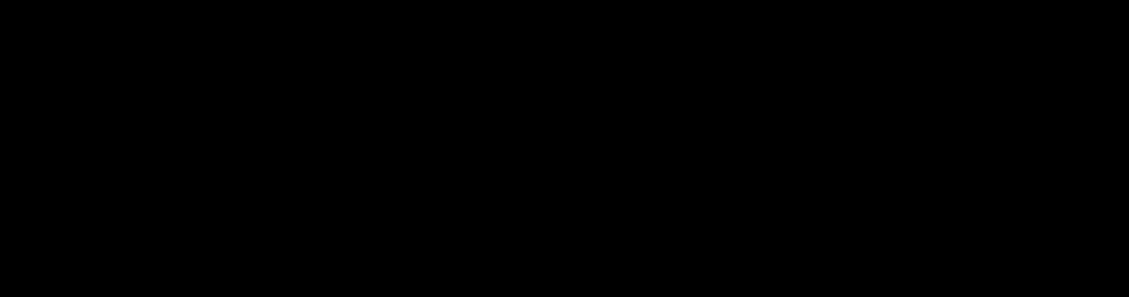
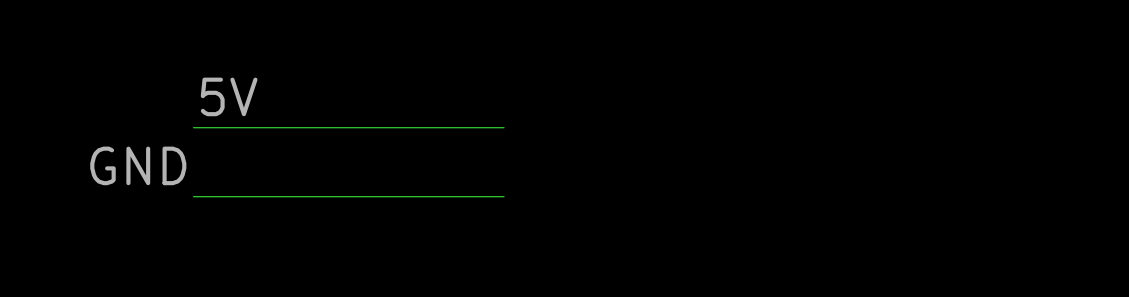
label: none -> 5V (229, 96)
wire: none -> (193, 127) (503, 127)
label: none -> GND (138, 165)
wire: none -> (193, 196) (503, 196)

